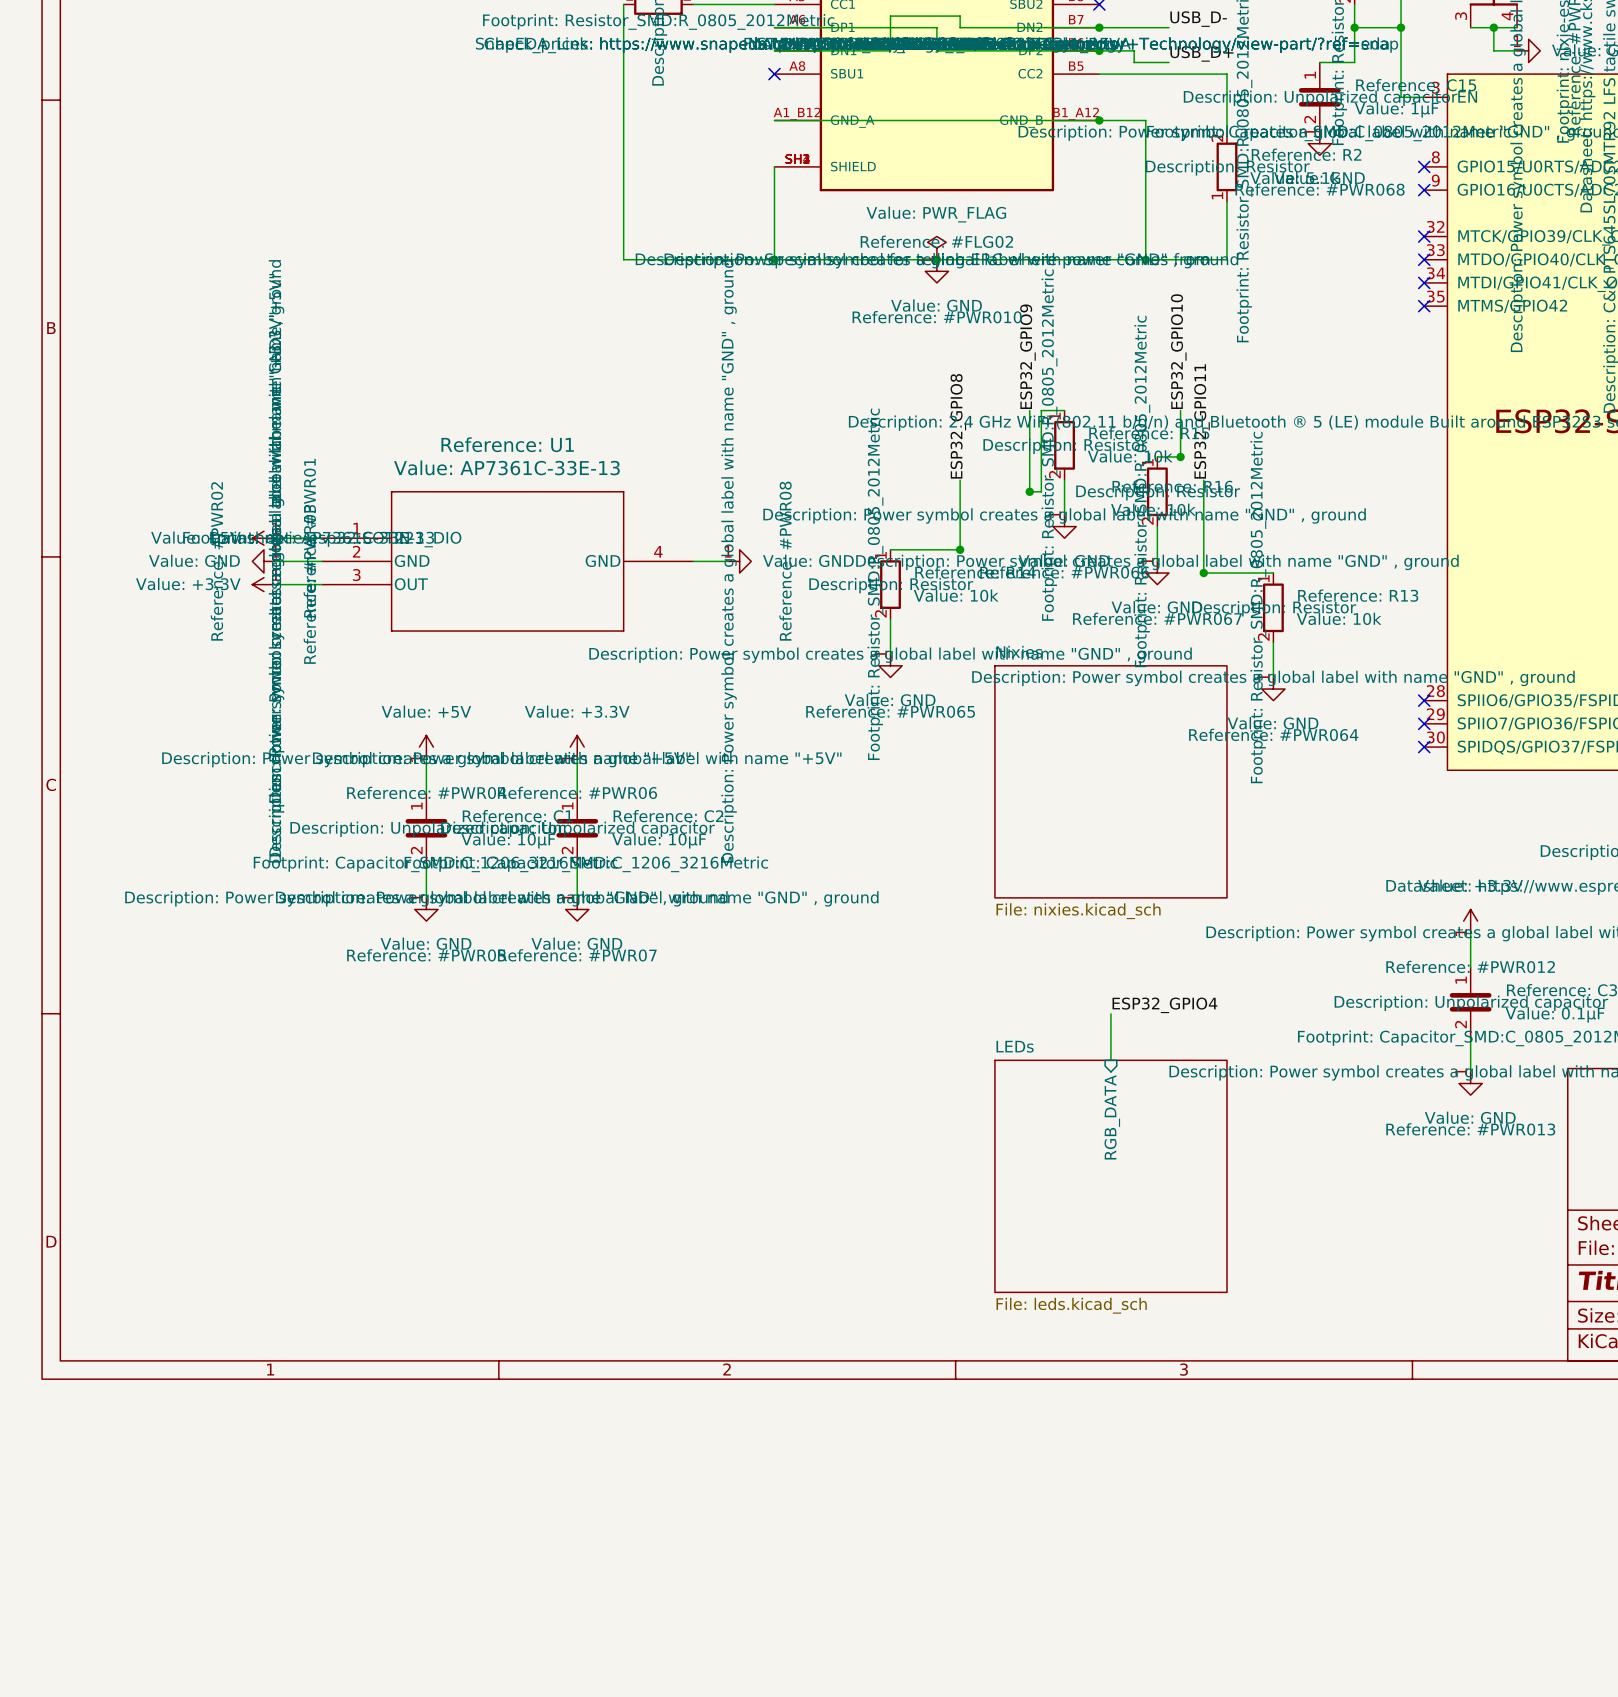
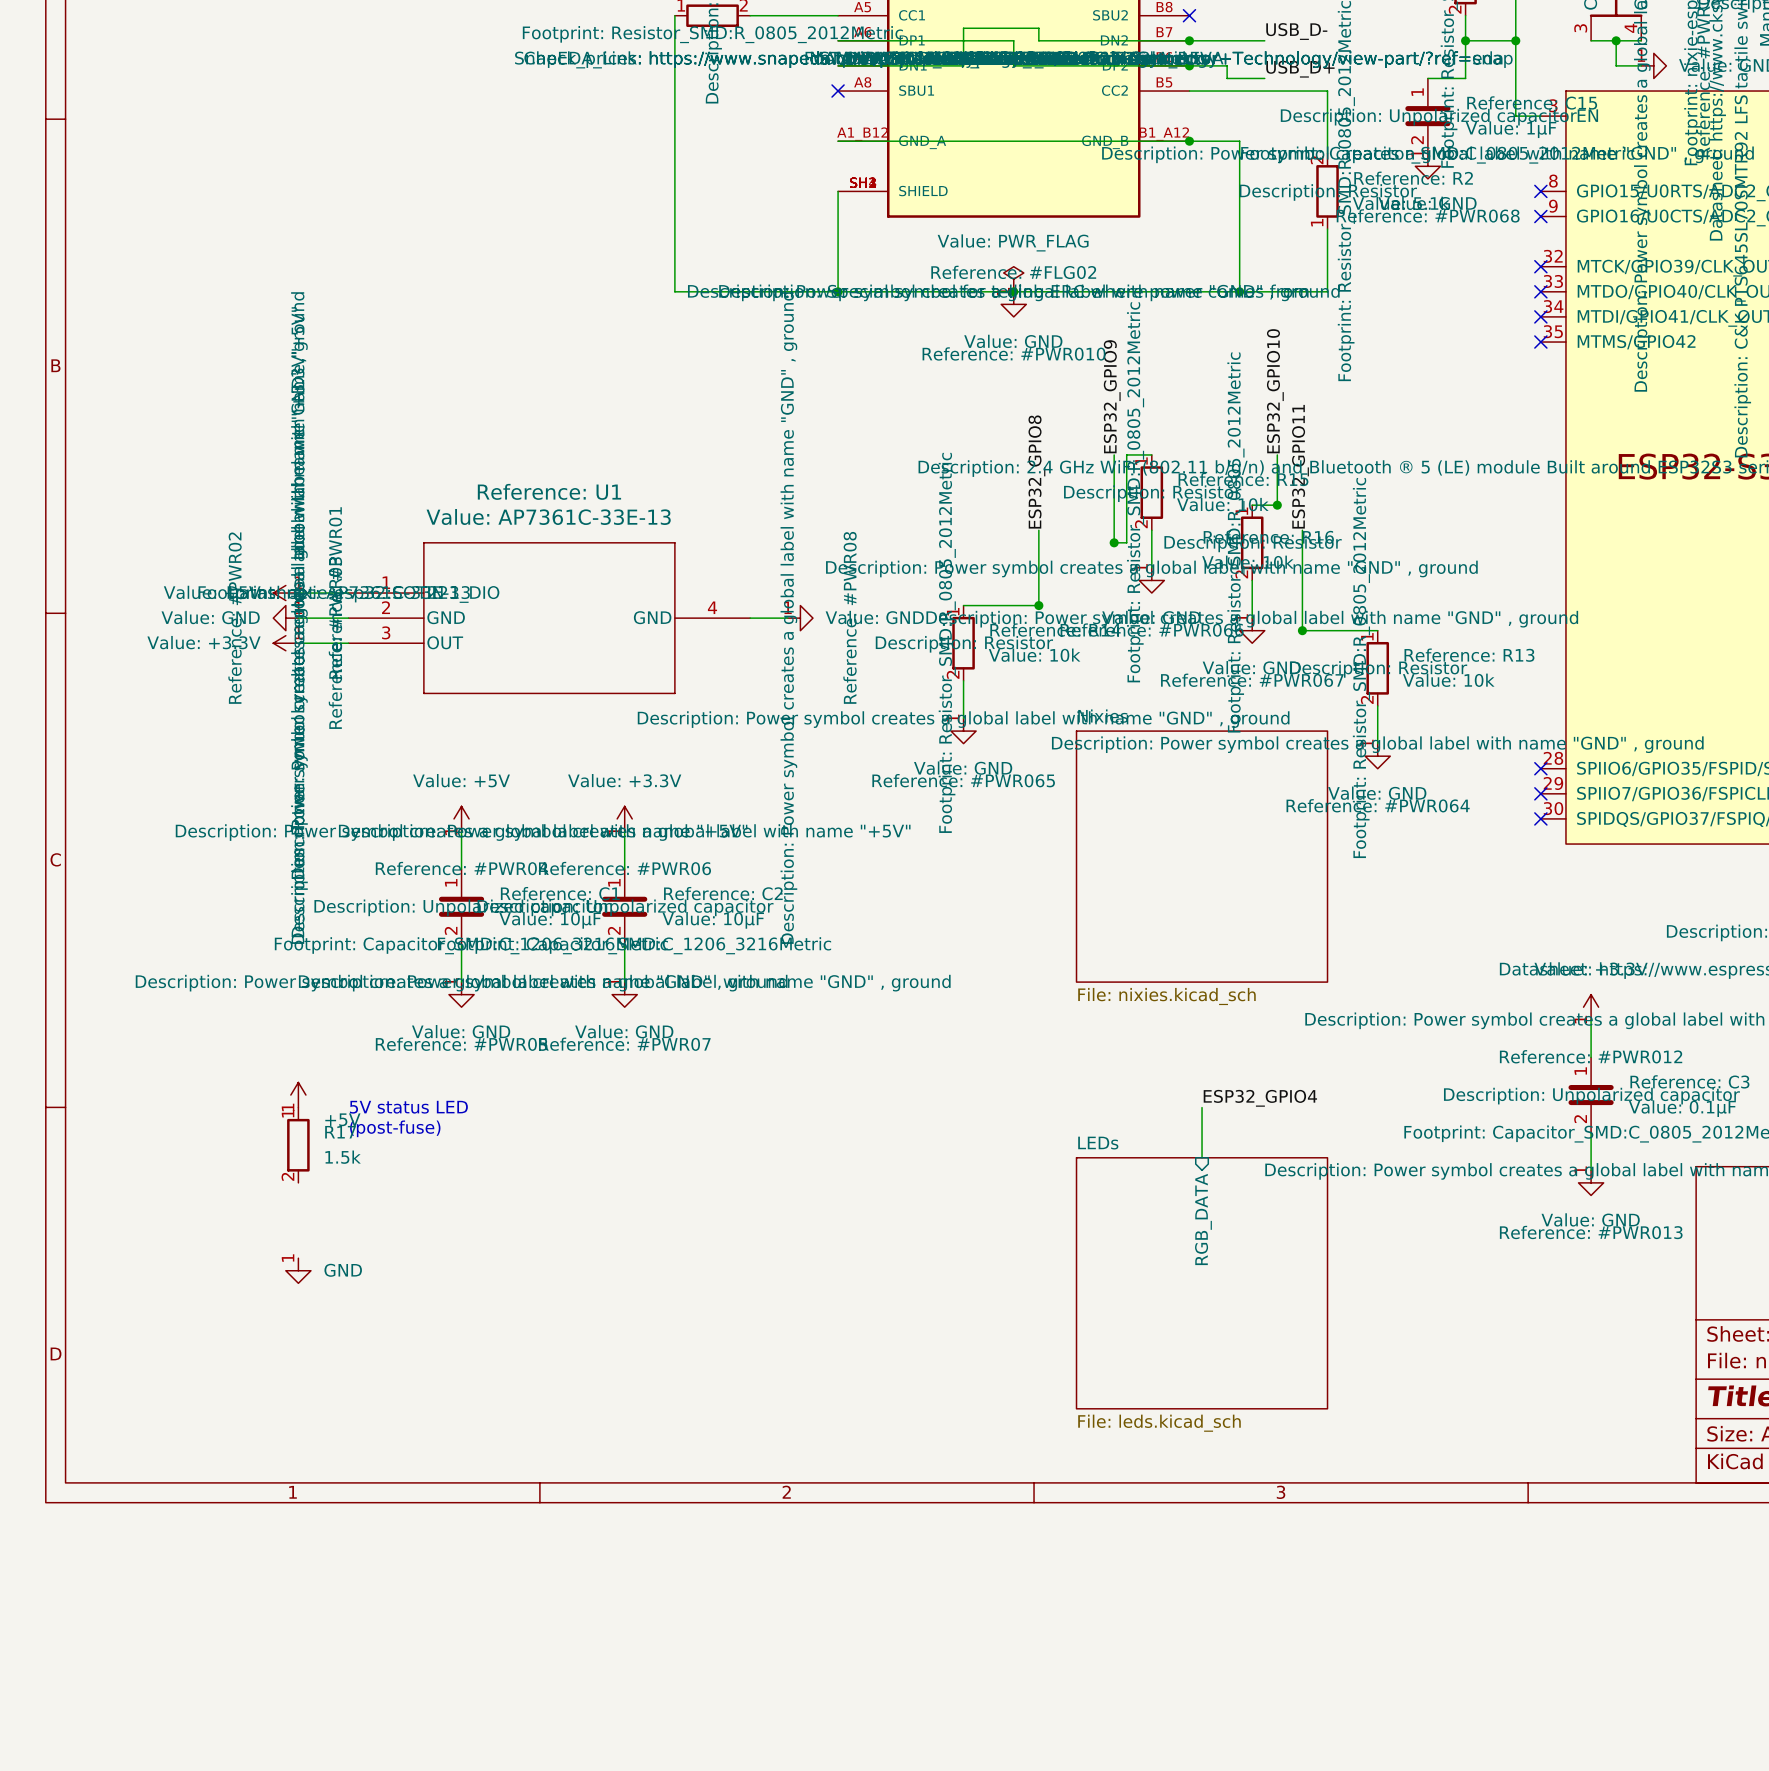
power symbol: none -> +5V (298, 1095)
text: none -> 5V status LED (408, 1107)
text: none -> (post-fuse) (395, 1128)
R17: none -> 1.5k (298, 1145)
power symbol: none -> GND (298, 1270)

